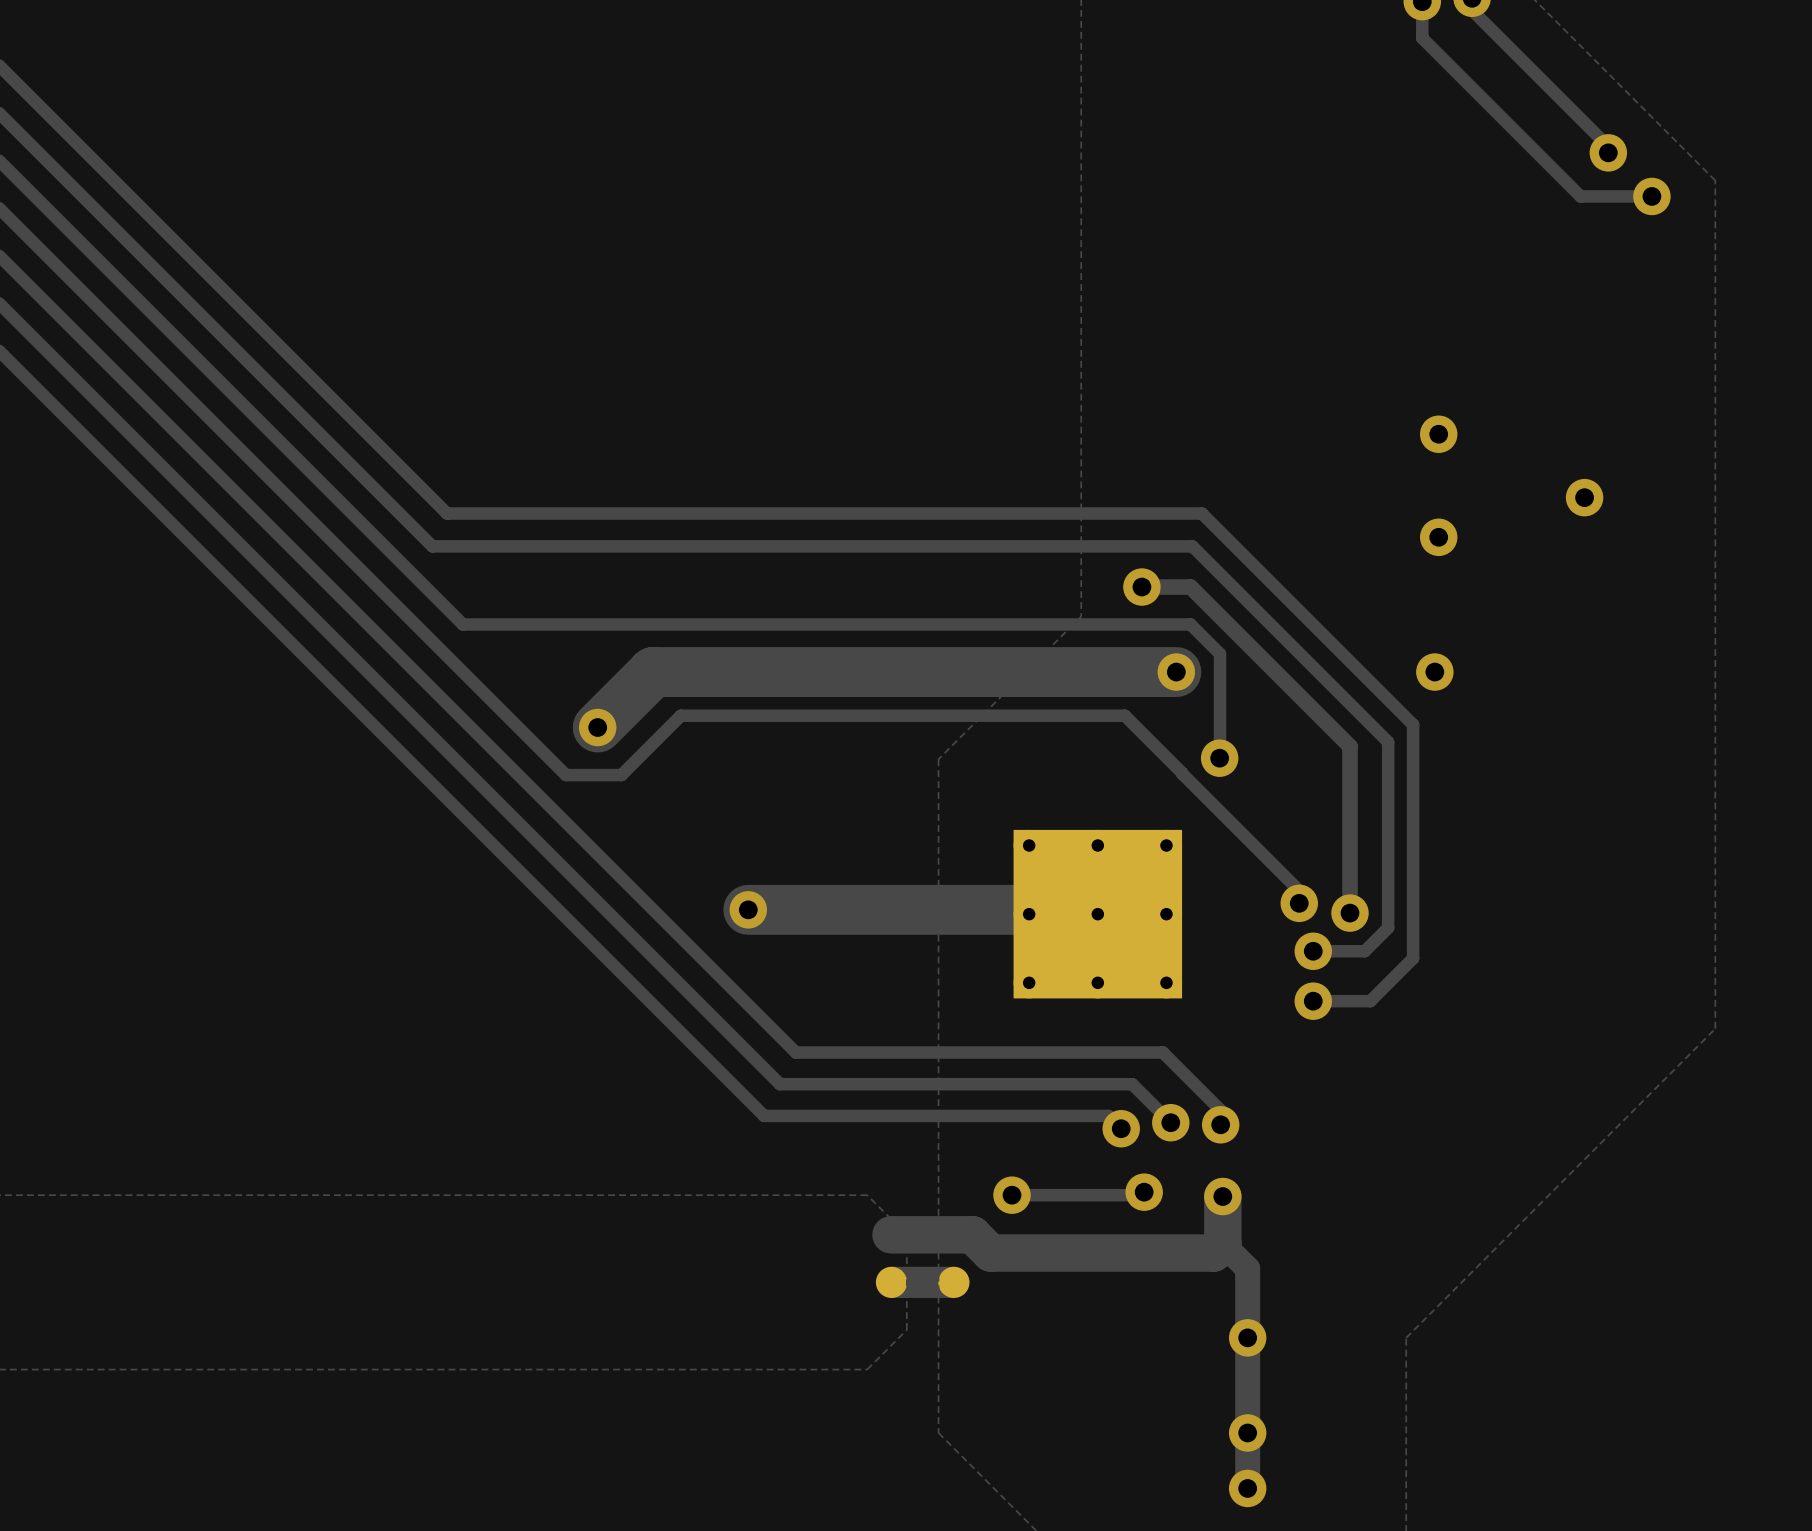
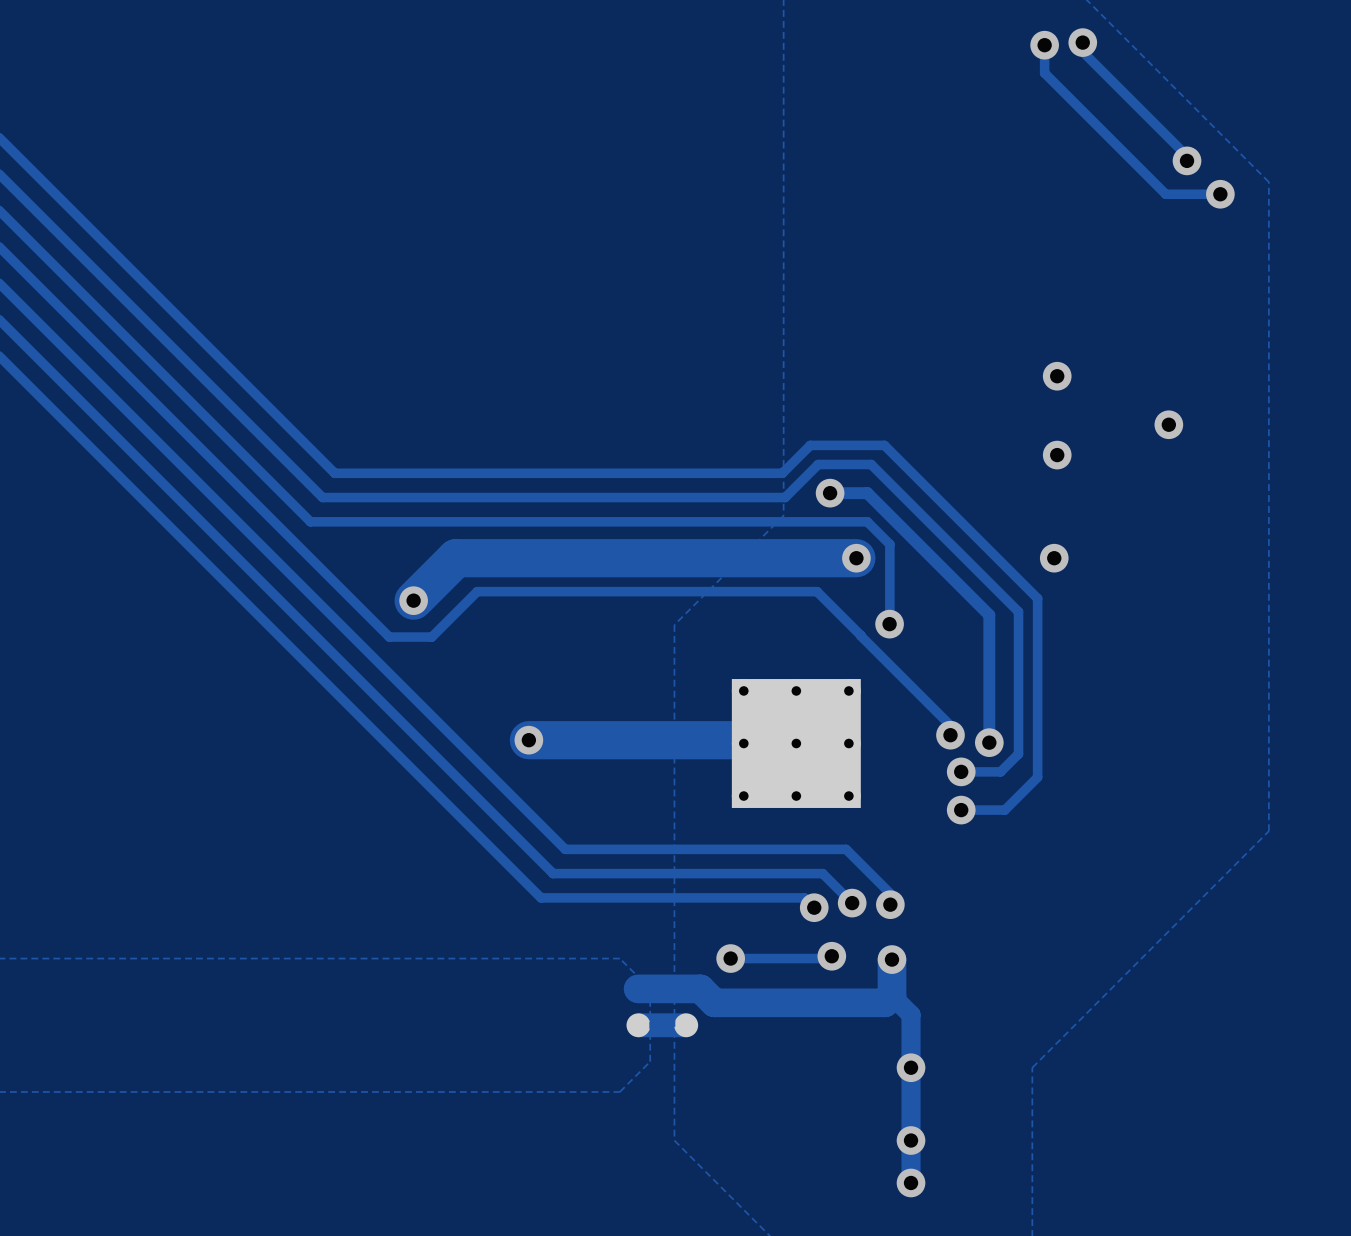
track: (447, 513) (1201, 513) (1213, 524) -> (298, 436) (334, 473) (782, 473) (810, 445) (884, 445)
track: (432, 546) (1192, 546) (1195, 549) -> (287, 462) (322, 497) (785, 497) (818, 464) (871, 464)

